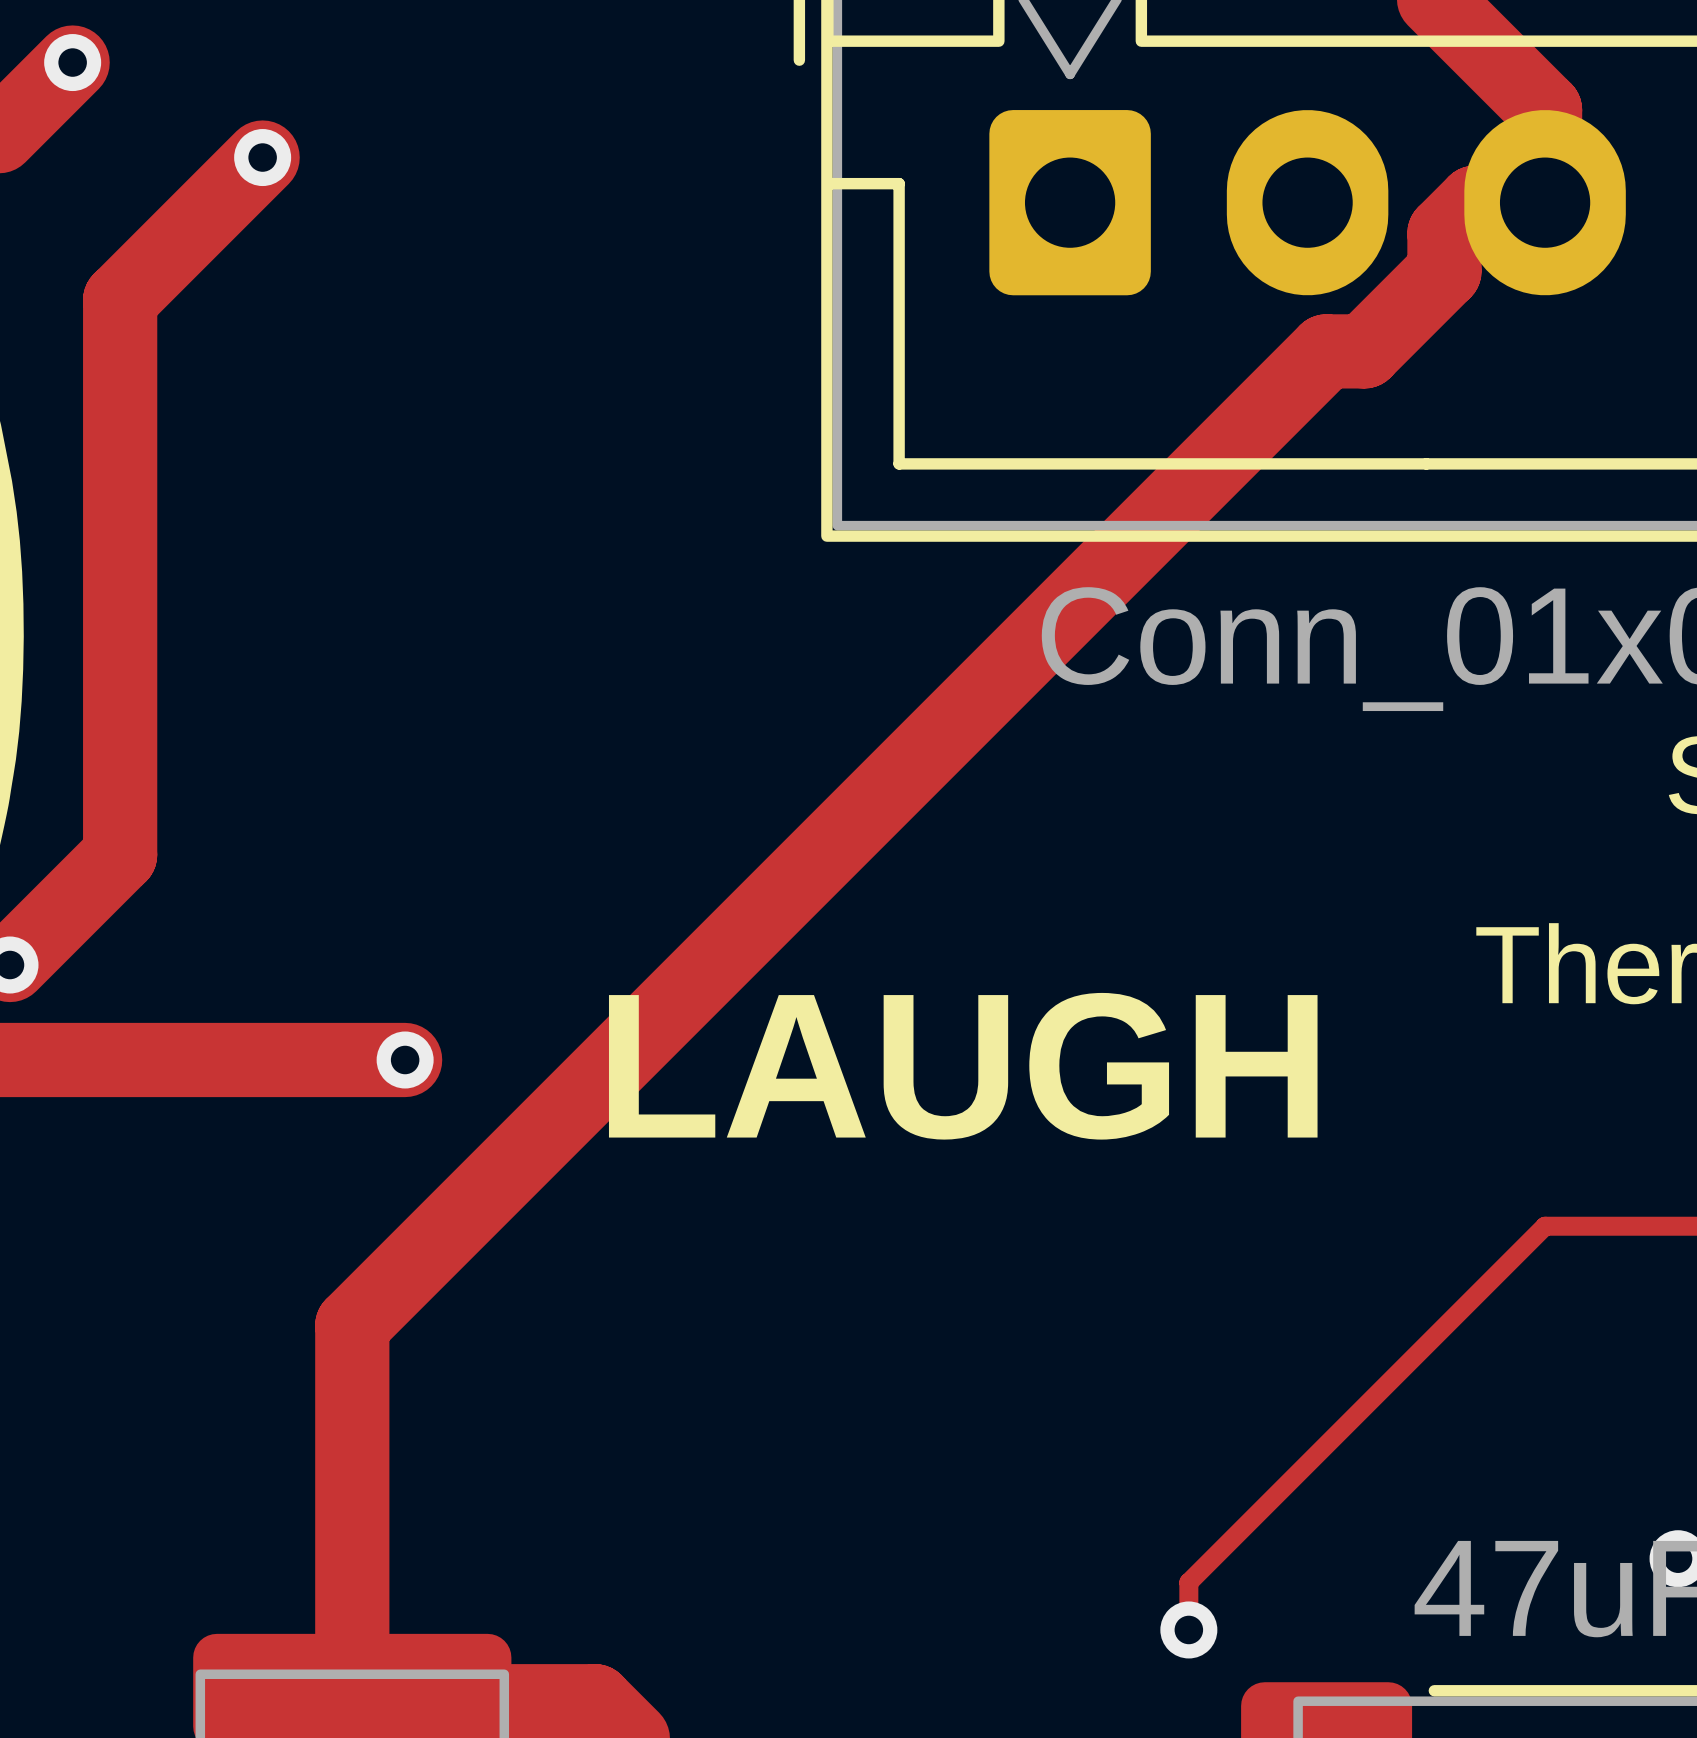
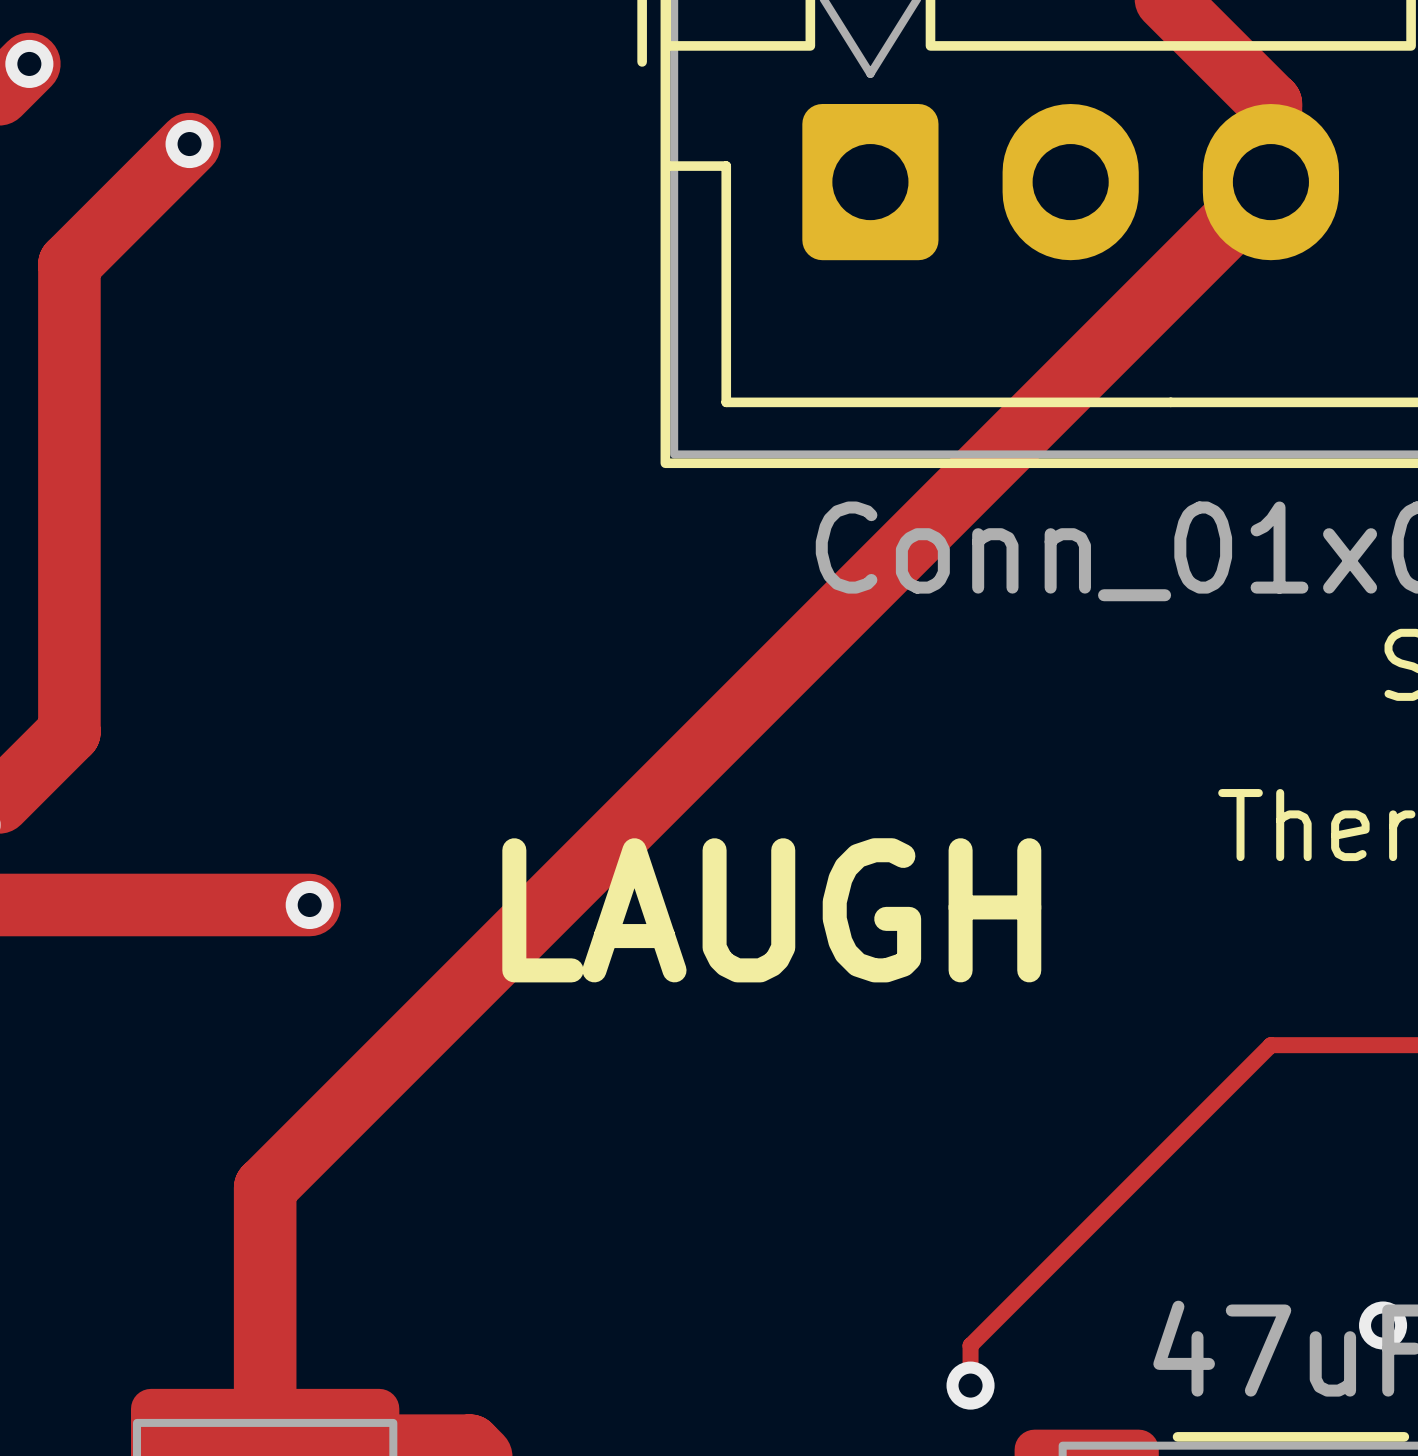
track: (1545, 202) (1475, 202) (1444, 233) (1444, 271) (1364, 351) (1326, 351) (352, 1325) (352, 1395) -> (1270, 182) (265, 1187)

